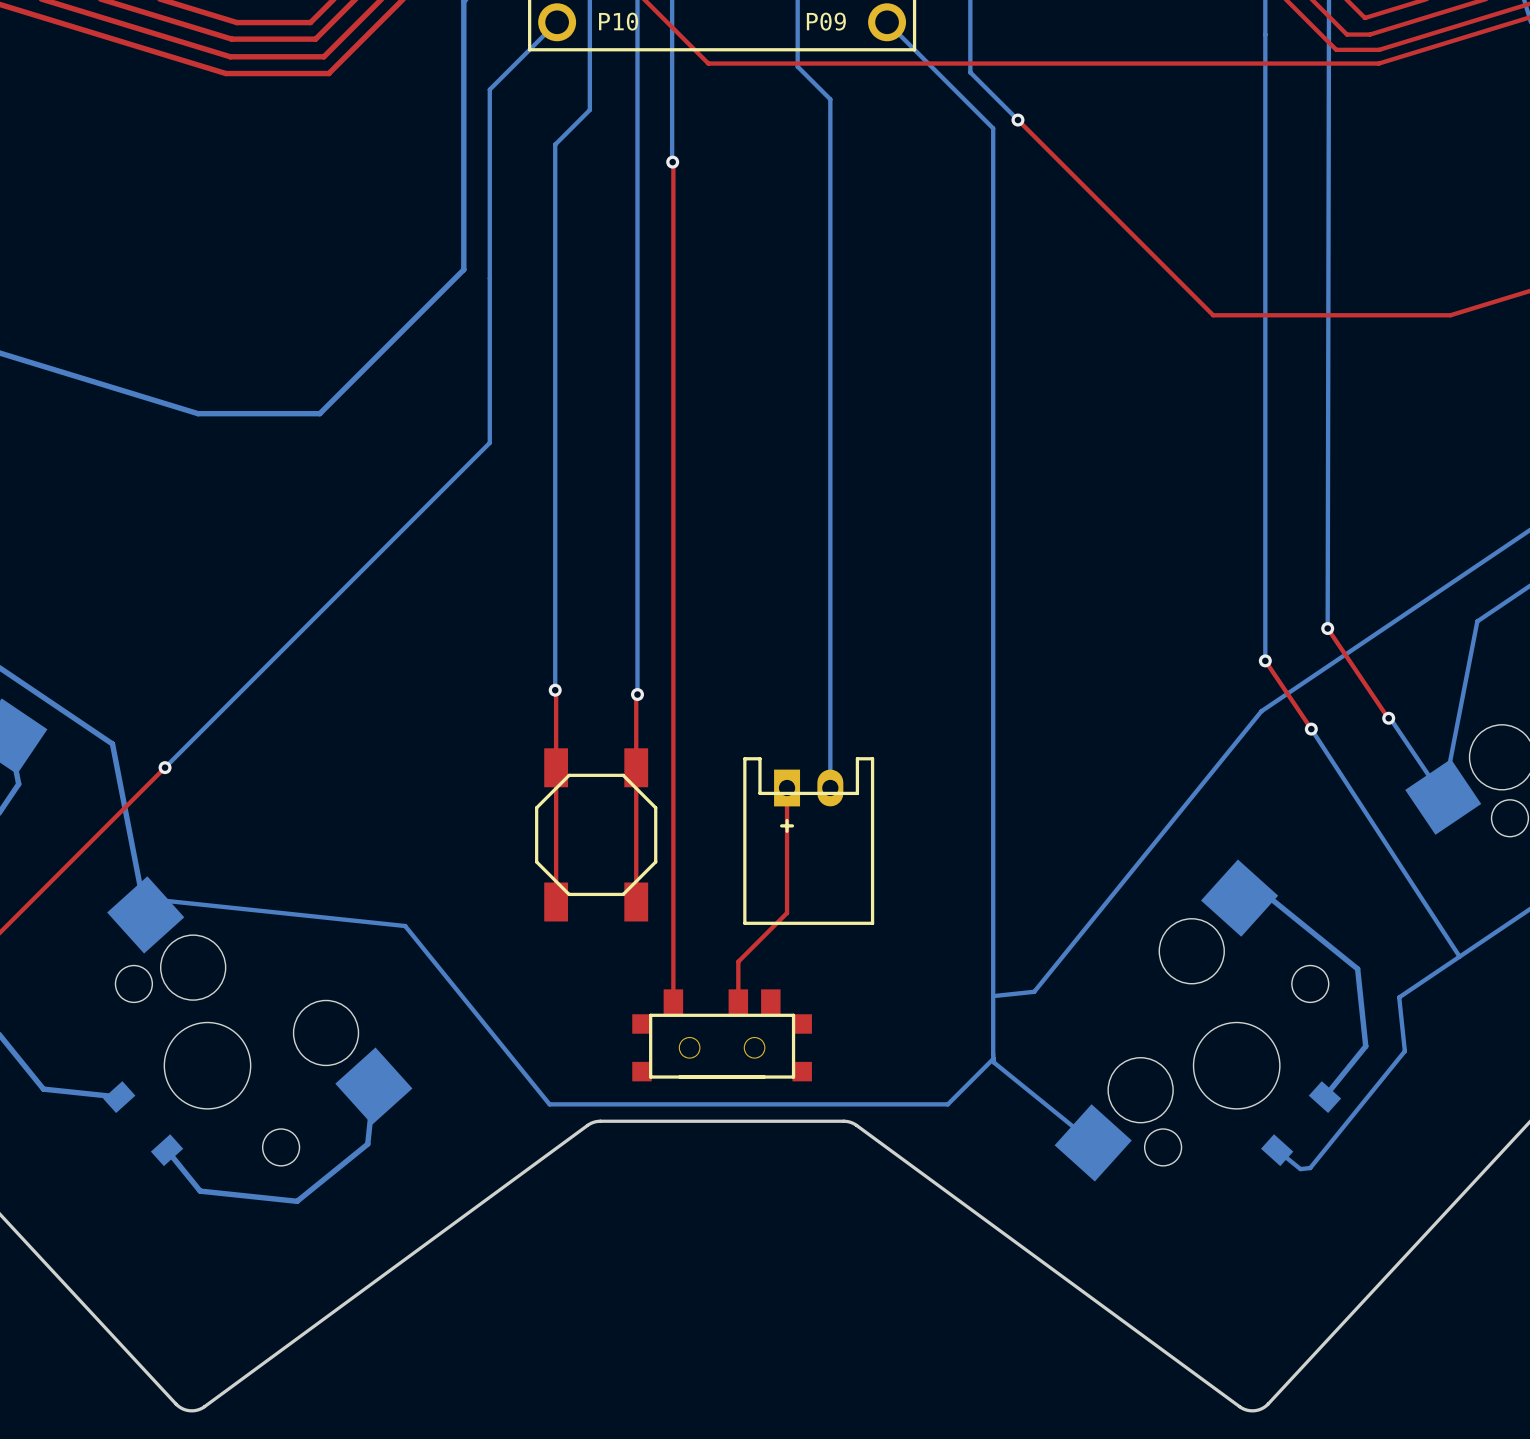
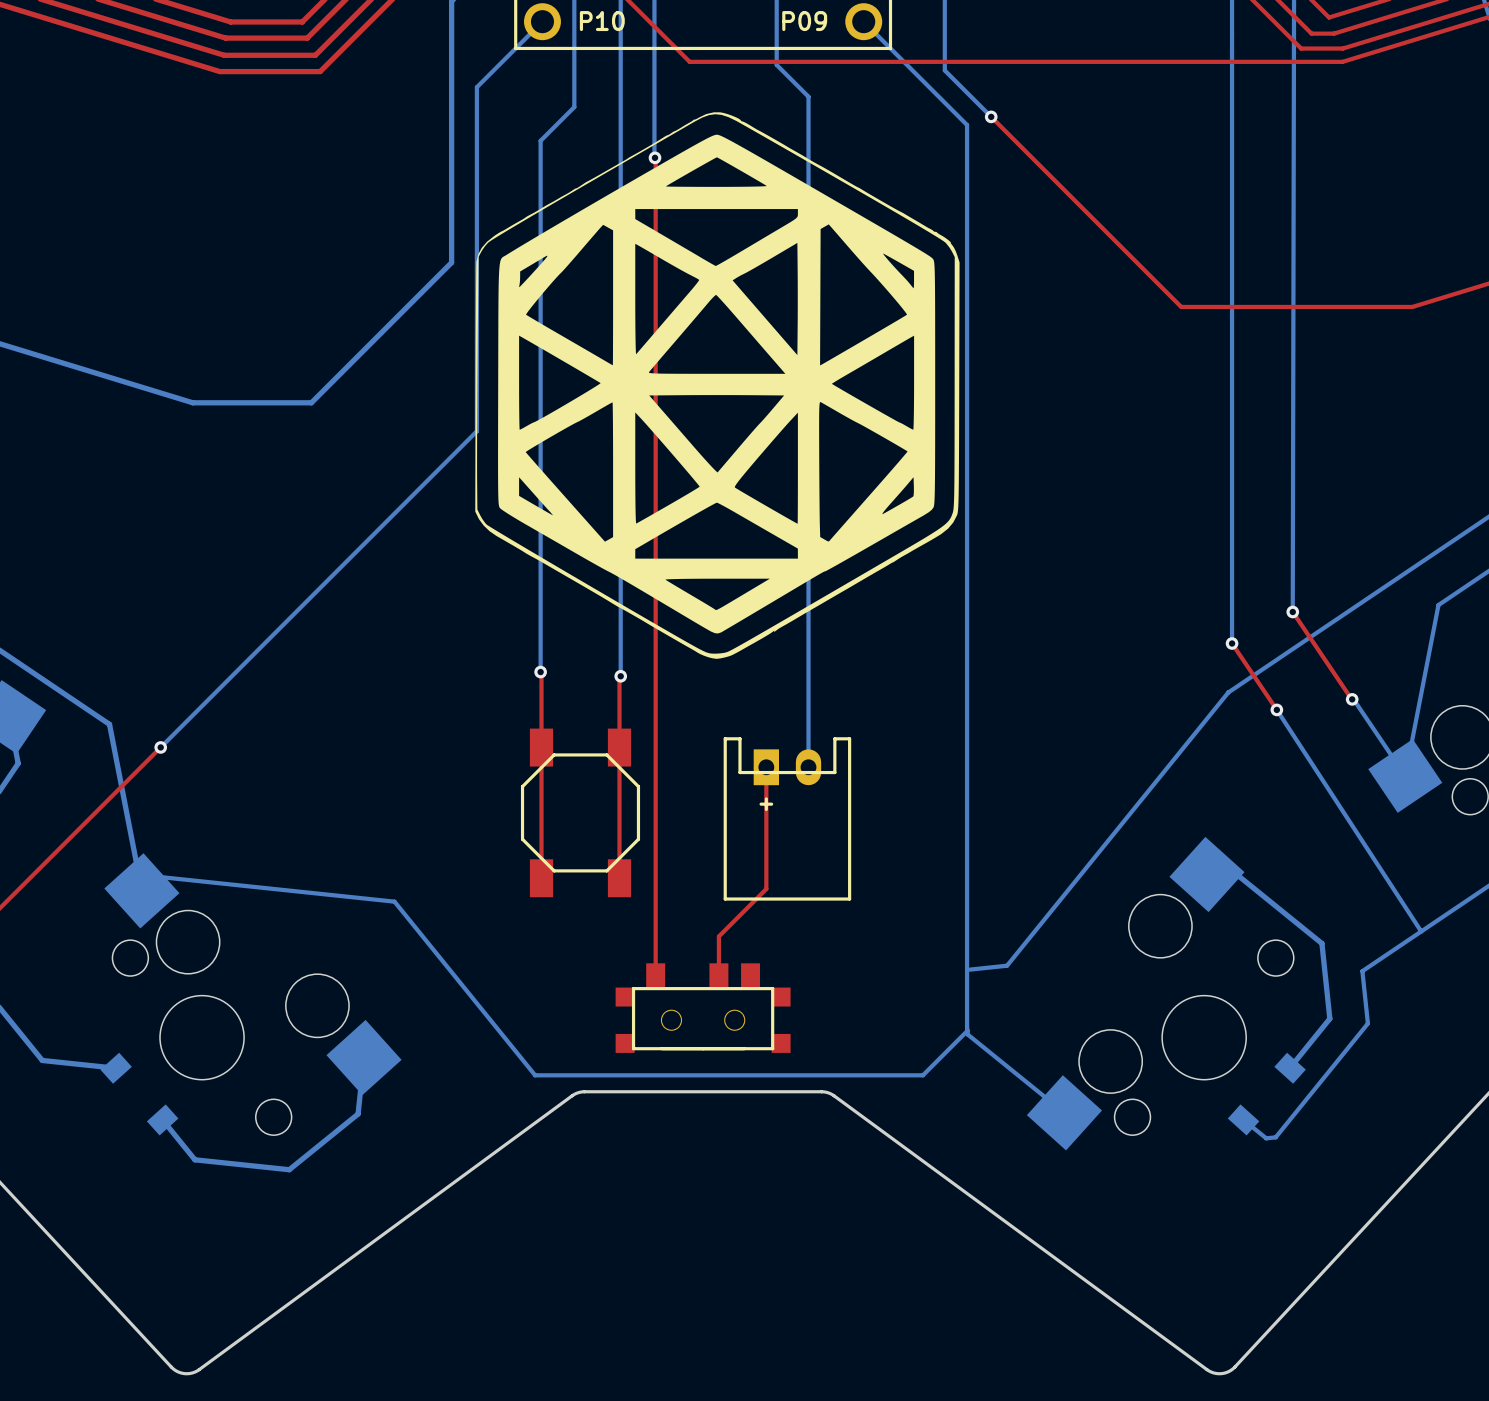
drawing: none -> [475, 112, 960, 659]

